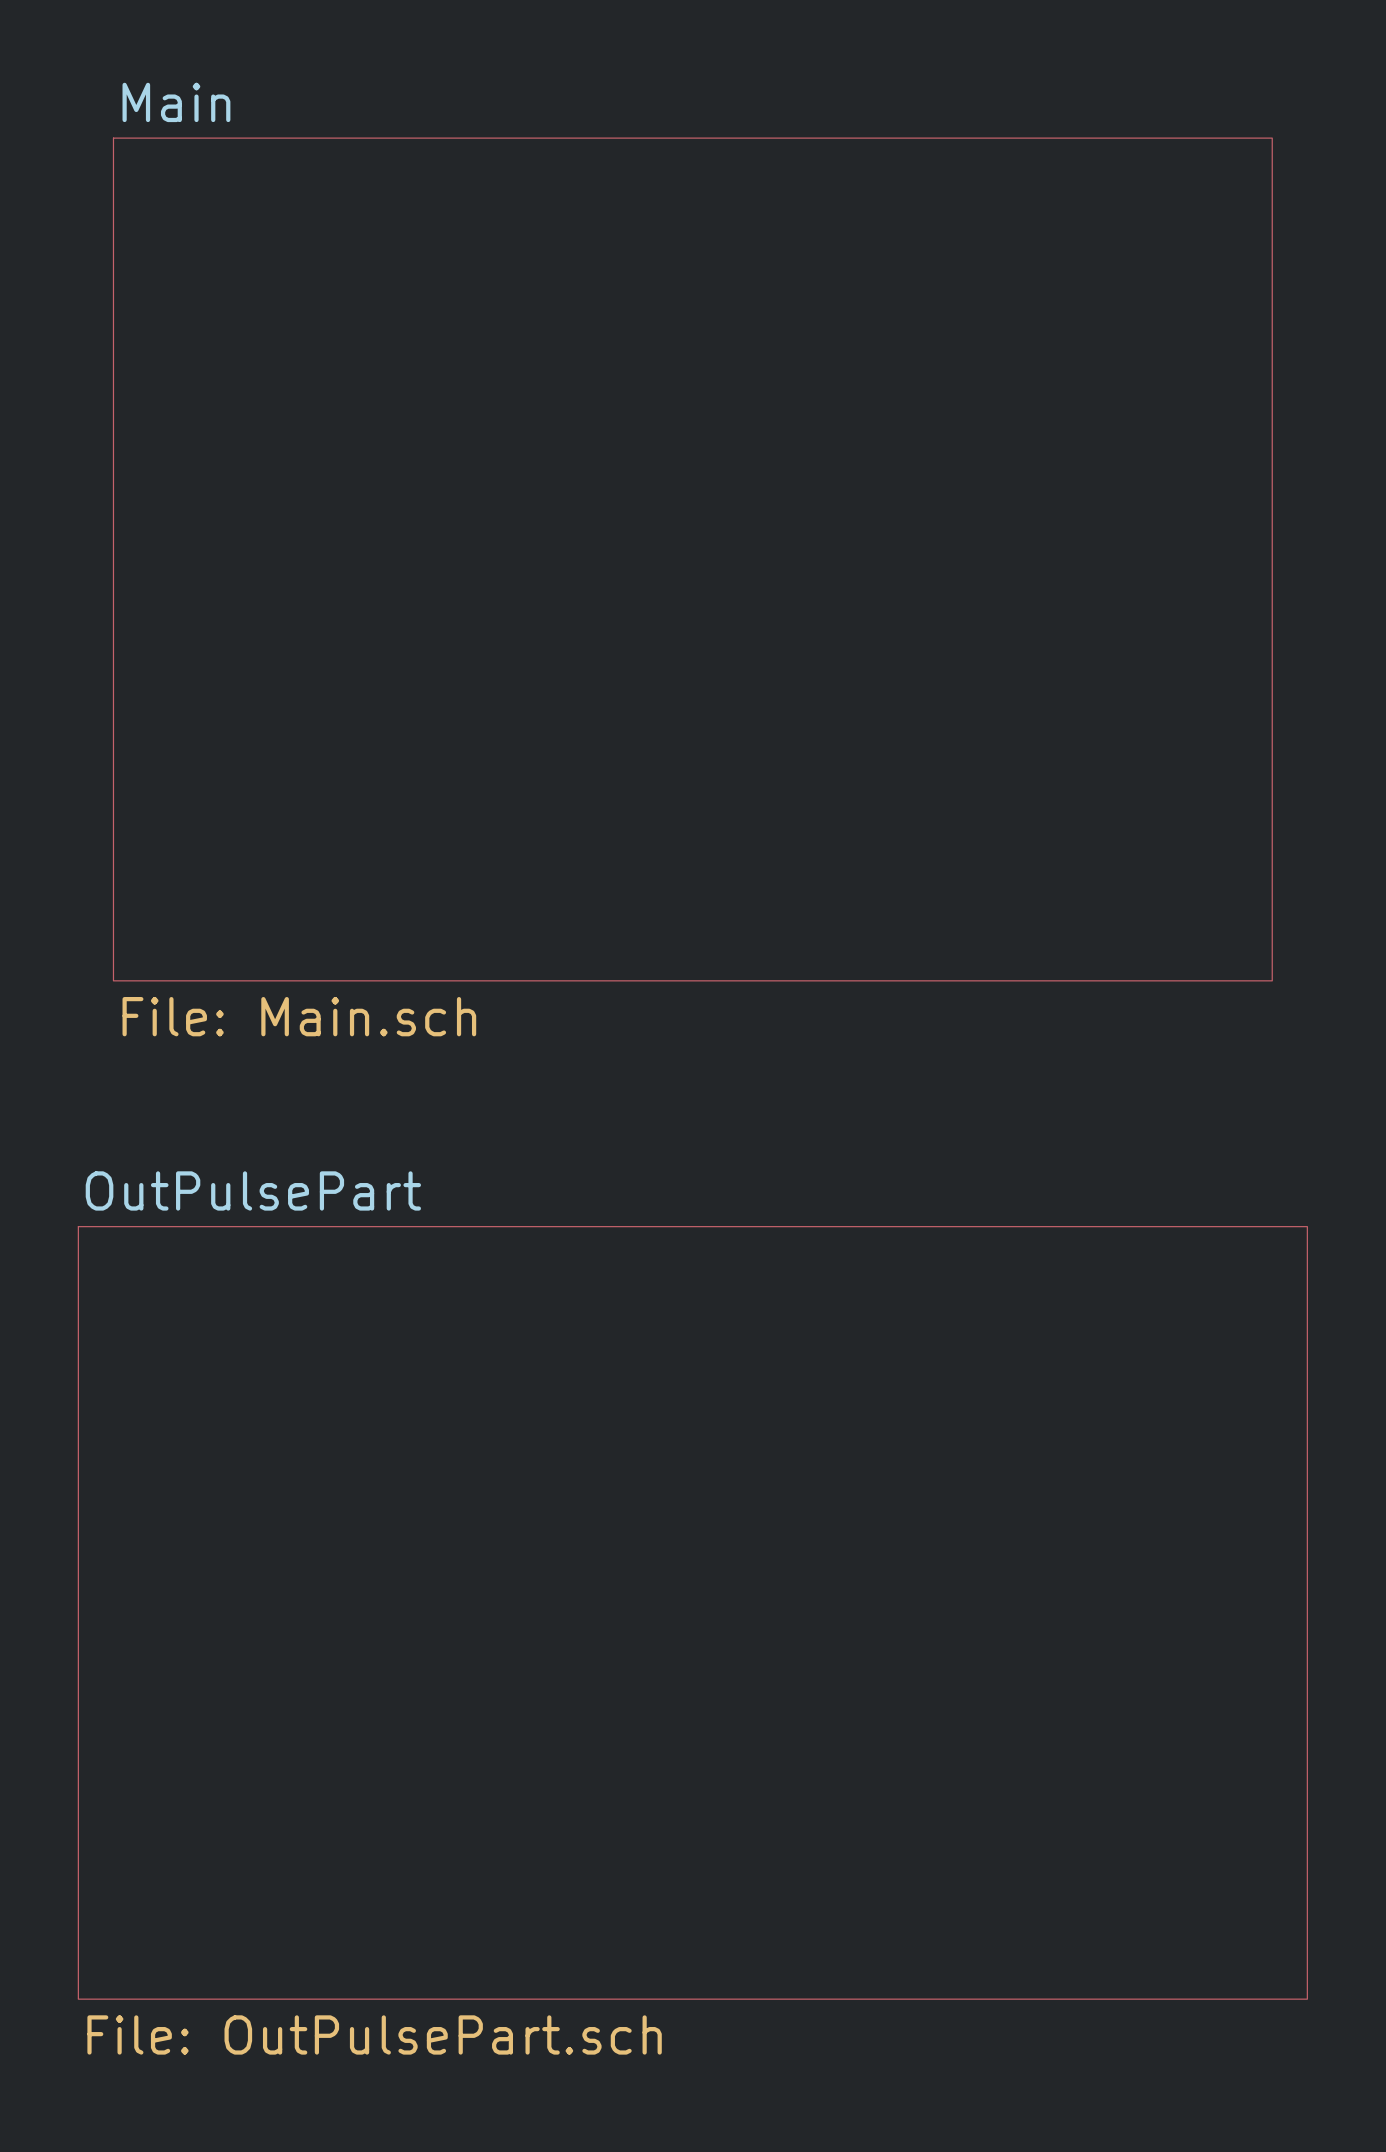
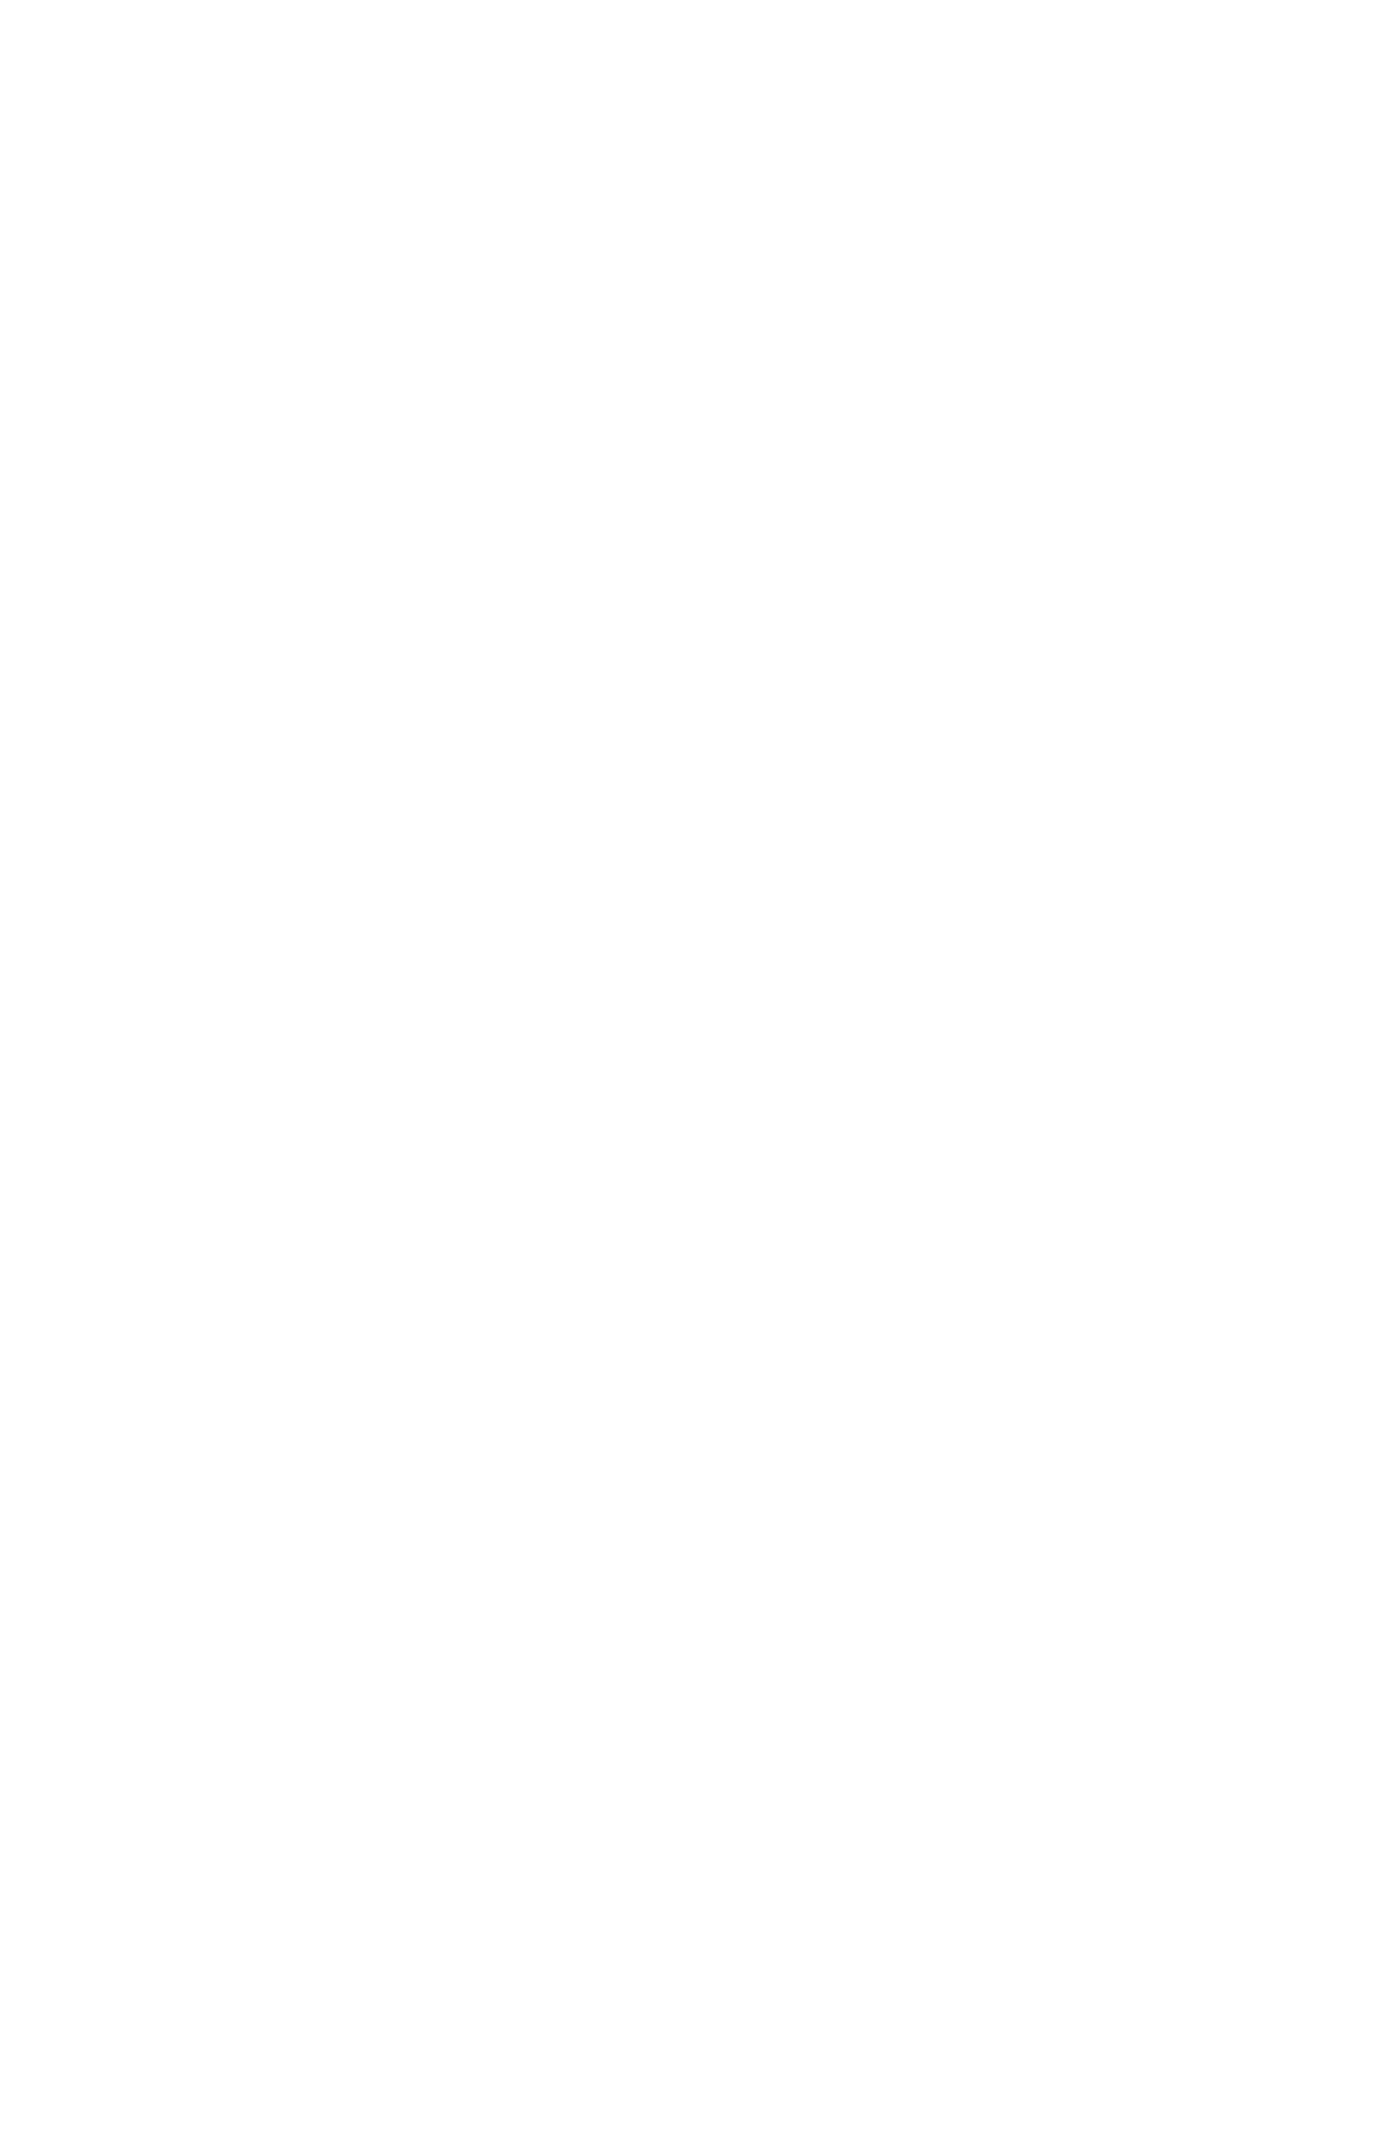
sheet Main: File: Main.sch (692, 559) -> none
sheet OutPulsePart: File: OutPulsePart.sch (692, 1612) -> none

